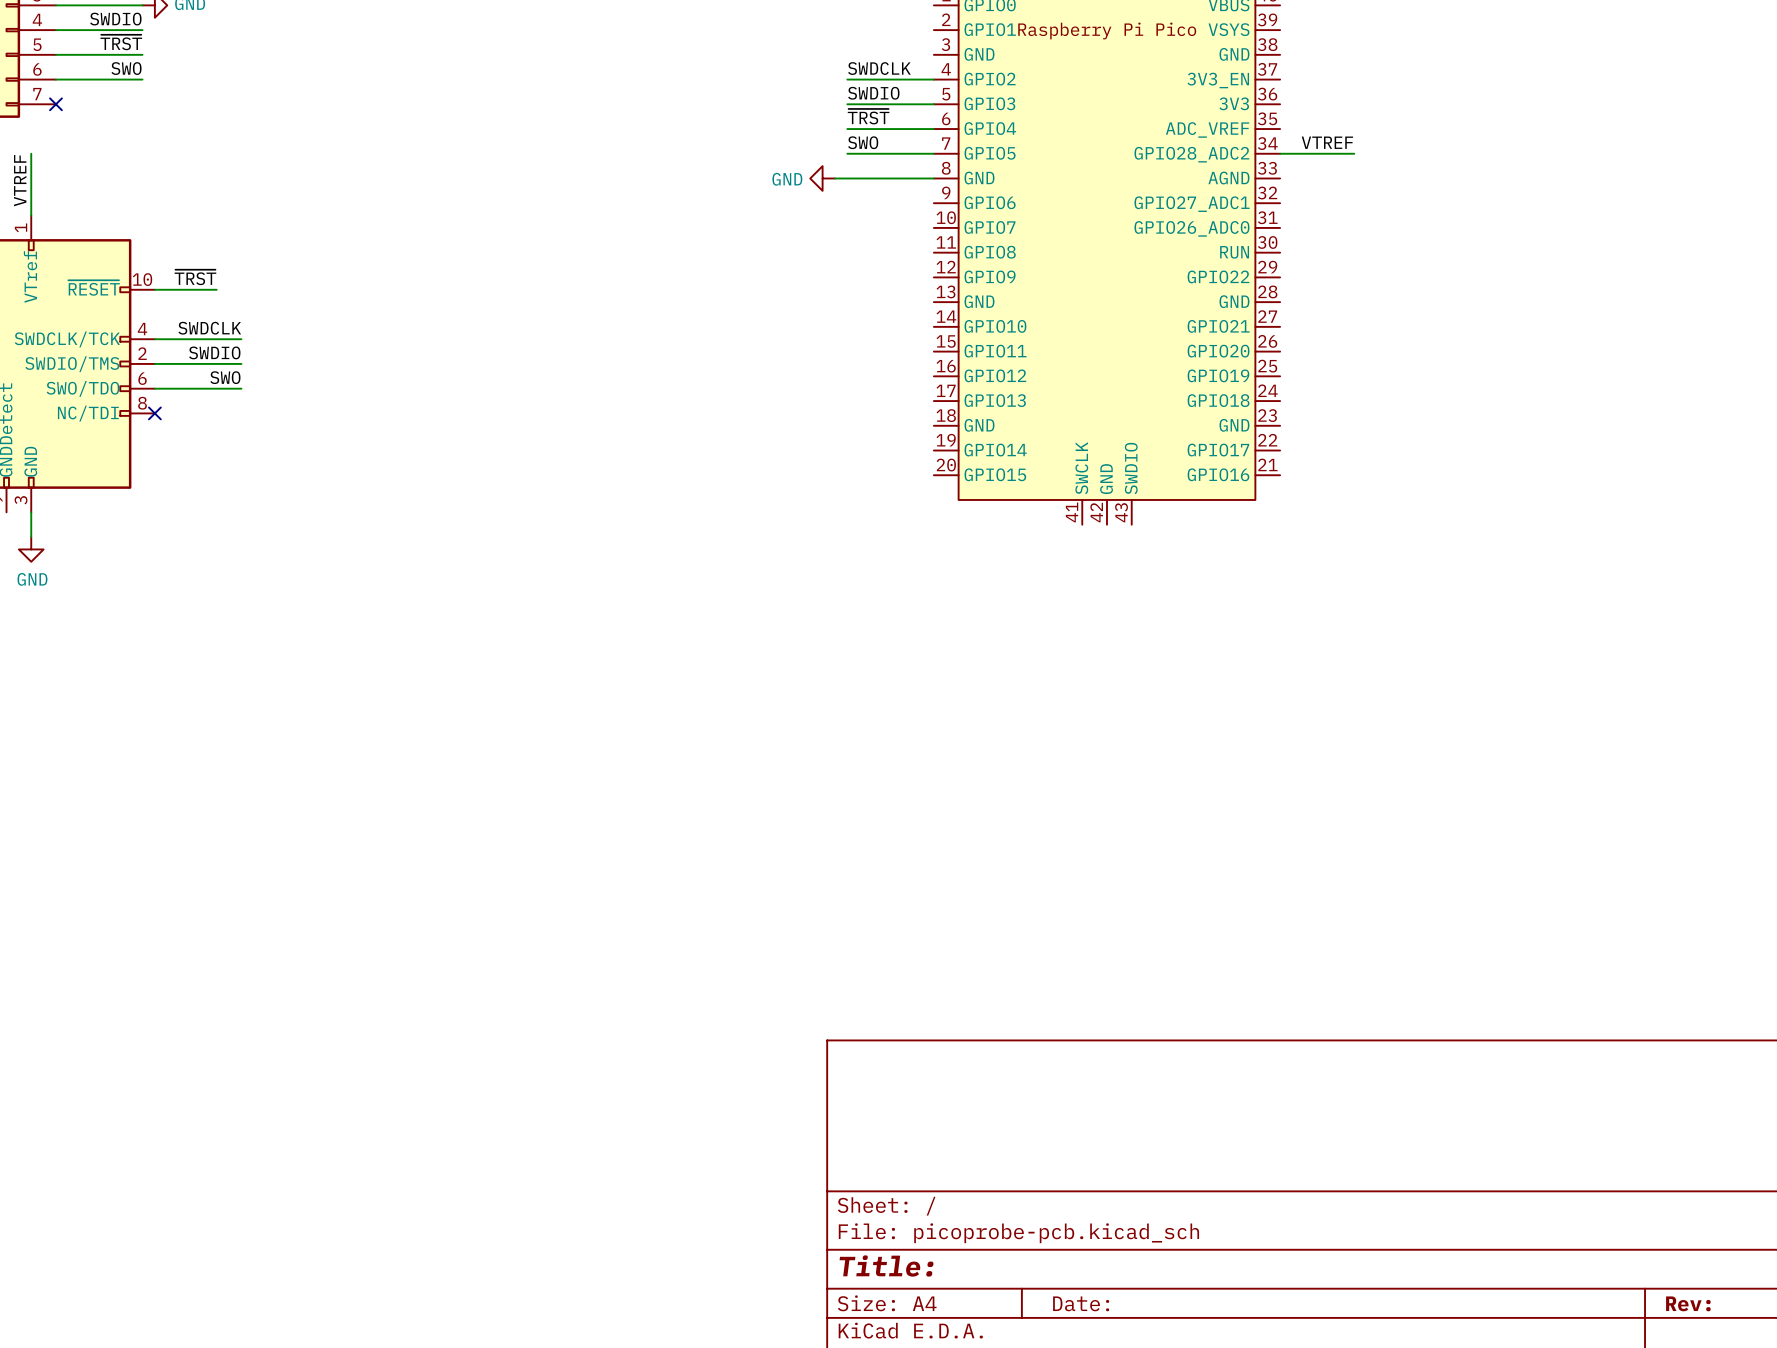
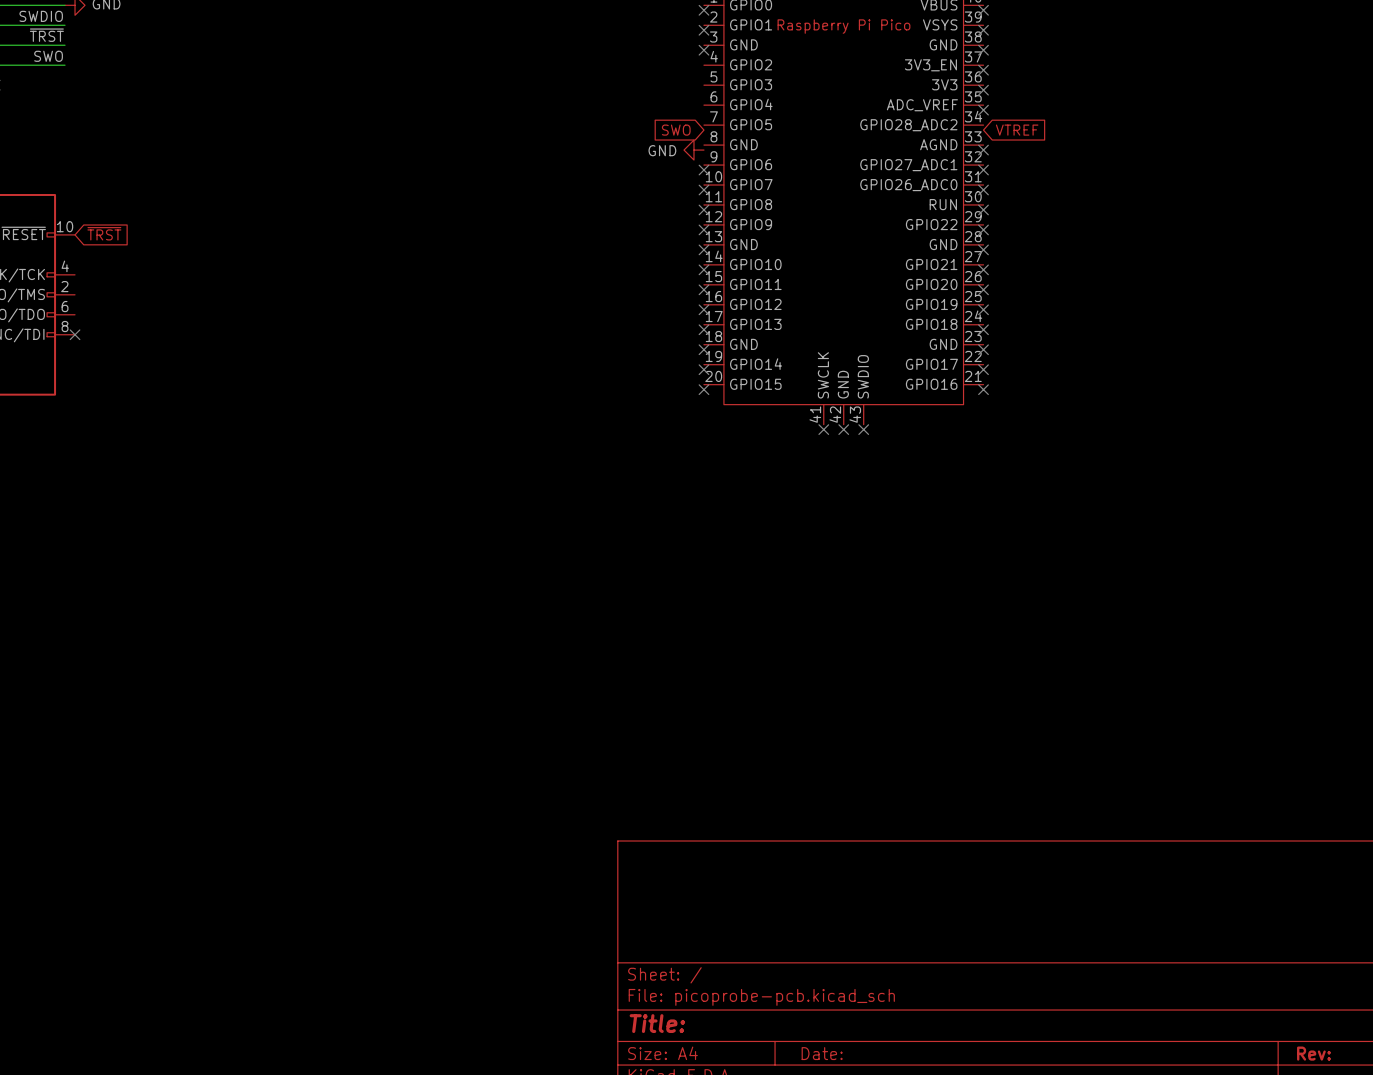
no-connect mark: none -> (703, 10)
no-connect mark: none -> (983, 10)
no-connect mark: none -> (703, 30)
no-connect mark: none -> (983, 30)
no-connect mark: none -> (703, 50)
no-connect mark: none -> (983, 50)
label: SWDCLK (879, 68) -> none
wire: (847, 79) (933, 79) -> none
no-connect mark: none -> (983, 70)
label: SWDIO (873, 93) -> none
wire: (847, 104) (933, 104) -> none
no-connect mark: none -> (983, 90)
label: ~{TRST} (868, 116) -> none
wire: (847, 129) (933, 129) -> none
no-connect mark: none -> (983, 110)
label: SWO (863, 142) -> none
label: VTREF (1327, 142) -> none
wire: (847, 153) (933, 153) -> none
wire: (1280, 153) (1354, 153) -> none
global label: none -> SWO (676, 130)
global label: none -> VTREF (1017, 130)
power symbol position: GND (822, 178) -> GND (693, 150)
wire: (834, 178) (933, 178) -> none
no-connect mark: none -> (983, 150)
no-connect mark: none -> (703, 170)
no-connect mark: none -> (983, 170)
no-connect mark: none -> (703, 190)
no-connect mark: none -> (983, 190)
no-connect mark: none -> (703, 209)
no-connect mark: none -> (983, 209)
label: ~{TRST} (195, 277) -> none
no-connect mark: none -> (703, 229)
no-connect mark: none -> (983, 229)
global label: none -> ~{TRST} (104, 233)
wire: (154, 289) (216, 289) -> none
no-connect mark: none -> (703, 249)
no-connect mark: none -> (983, 249)
label: SWDCLK (209, 328) -> none
no-connect mark: none -> (703, 269)
no-connect mark: none -> (983, 269)
wire: (154, 339) (241, 339) -> none
label: SWDIO (214, 352) -> none
no-connect mark: none -> (703, 289)
no-connect mark: none -> (983, 289)
wire: (154, 363) (241, 363) -> none
label: SWO (225, 377) -> none
no-connect mark: none -> (703, 309)
no-connect mark: none -> (983, 309)
wire: (154, 388) (241, 388) -> none
no-connect mark: none -> (703, 329)
no-connect mark: none -> (983, 329)
no-connect mark: none -> (703, 349)
no-connect mark: none -> (983, 349)
no-connect mark: none -> (703, 369)
no-connect mark: none -> (983, 369)
no-connect mark: none -> (703, 389)
no-connect mark: none -> (983, 389)
no-connect mark: none -> (823, 429)
no-connect mark: none -> (843, 429)
no-connect mark: none -> (863, 429)

